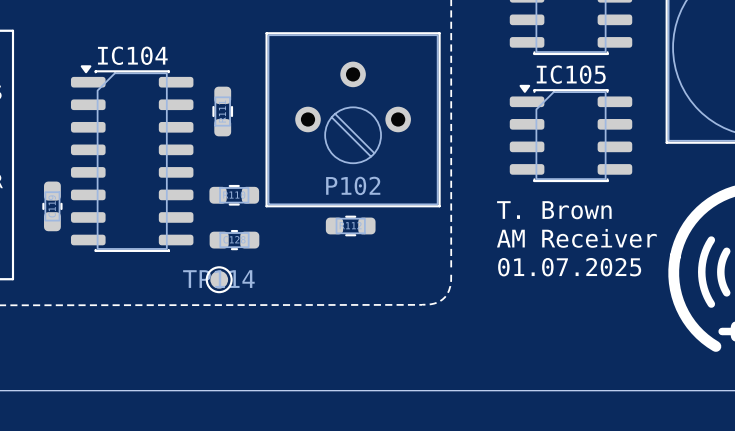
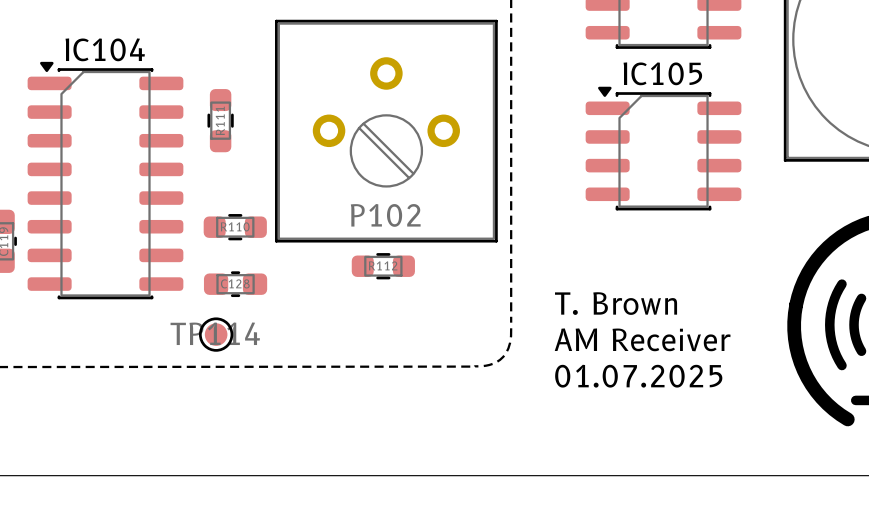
text position: T. Brown (554, 210) -> T. Brown (616, 303)
text position: AM Receiver (576, 238) -> AM Receiver (642, 339)
text position: 01.07.2025 (569, 267) -> 01.07.2025 (638, 376)

